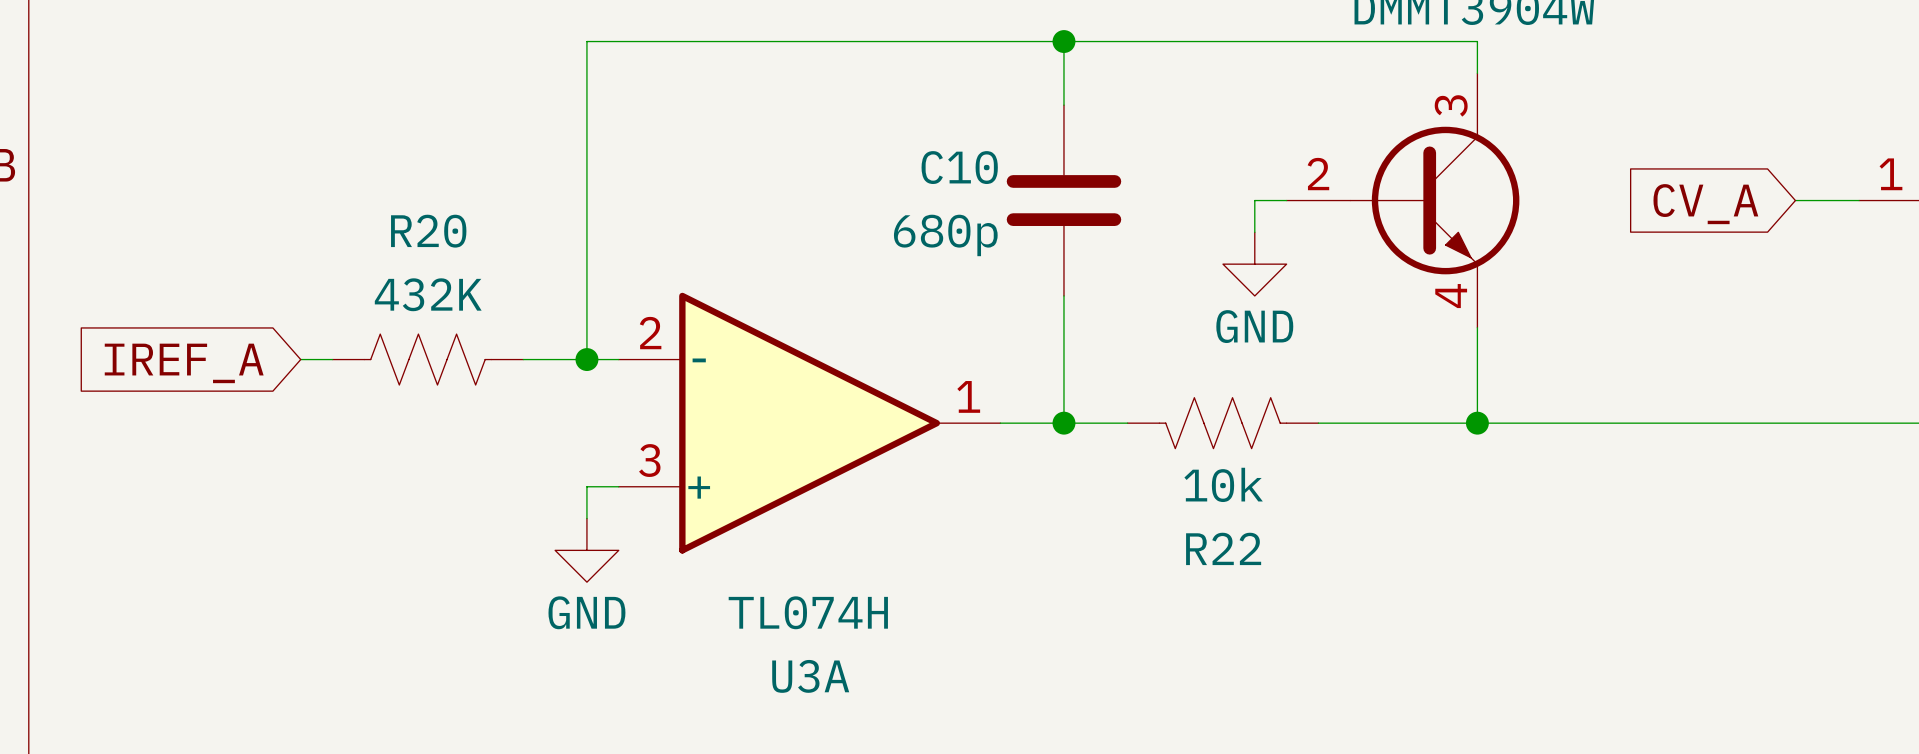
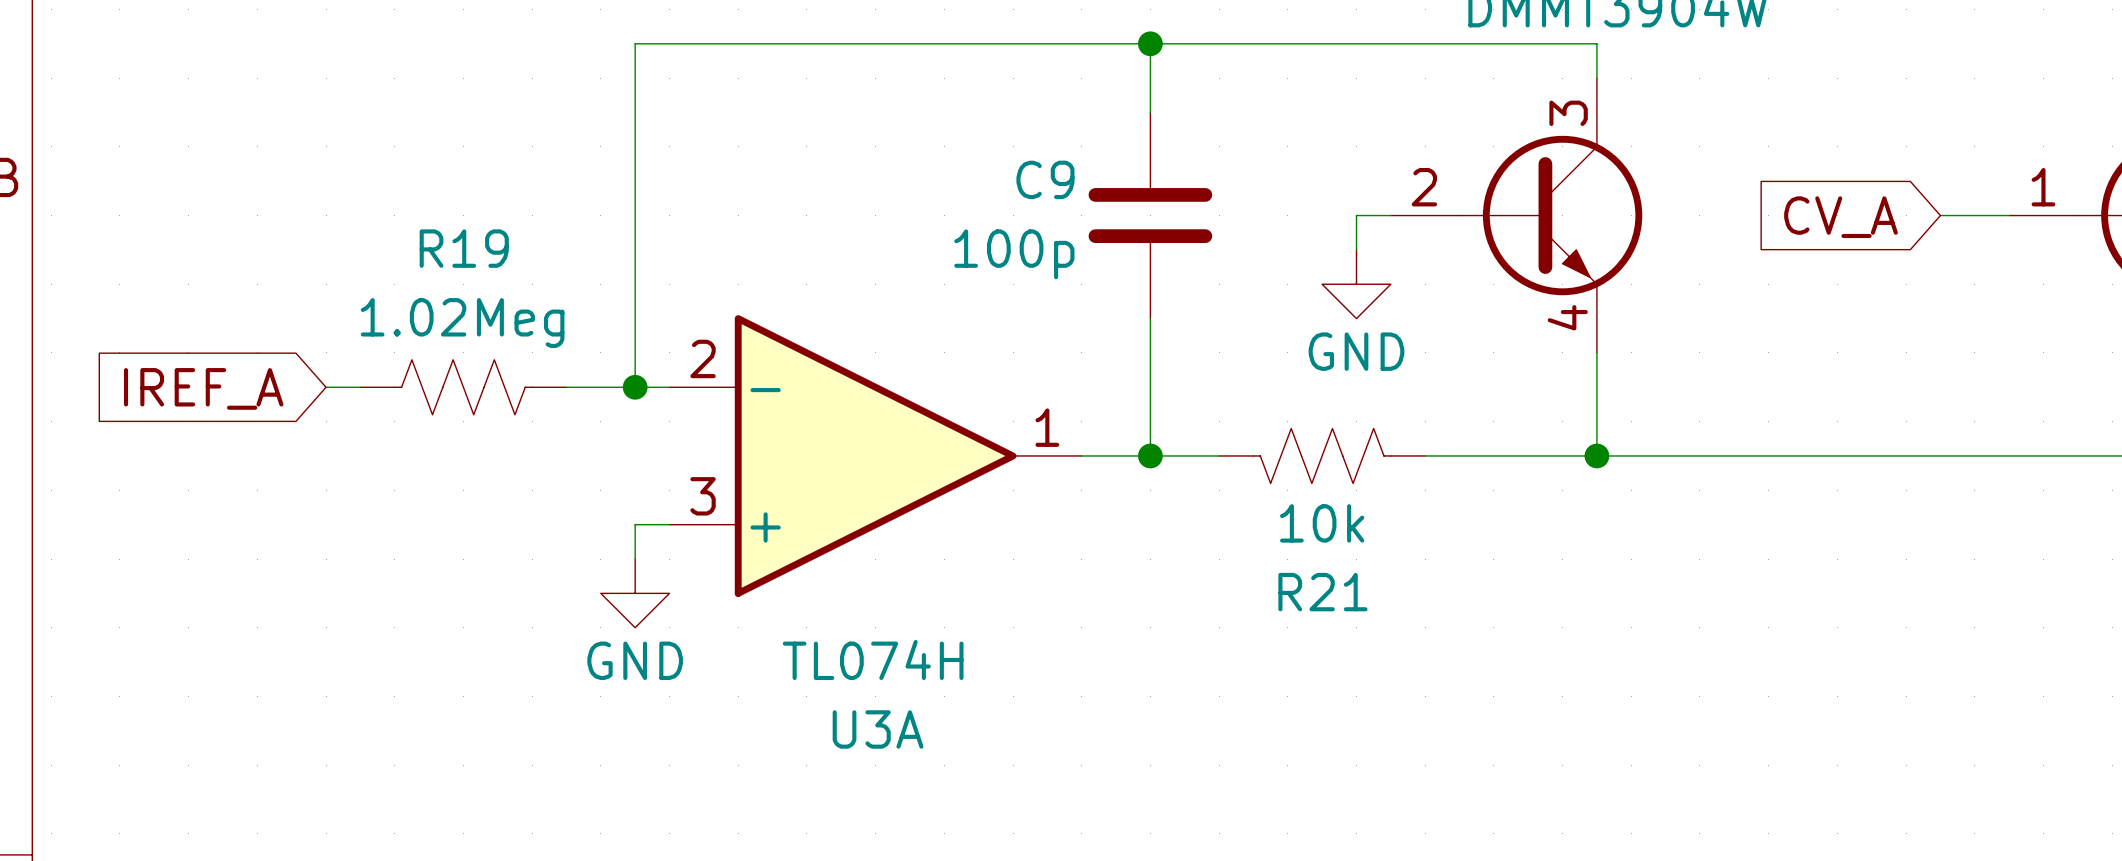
C10 name: C10 (959, 167) -> C9 (1045, 179)
R20 name: R20 (428, 231) -> R19 (464, 248)
C10 value: 680p (945, 235) -> 100p (1014, 254)
R20 value: 432K (428, 294) -> 1.02Meg (462, 323)
R22 name: R22 (1223, 548) -> R21 (1322, 592)

